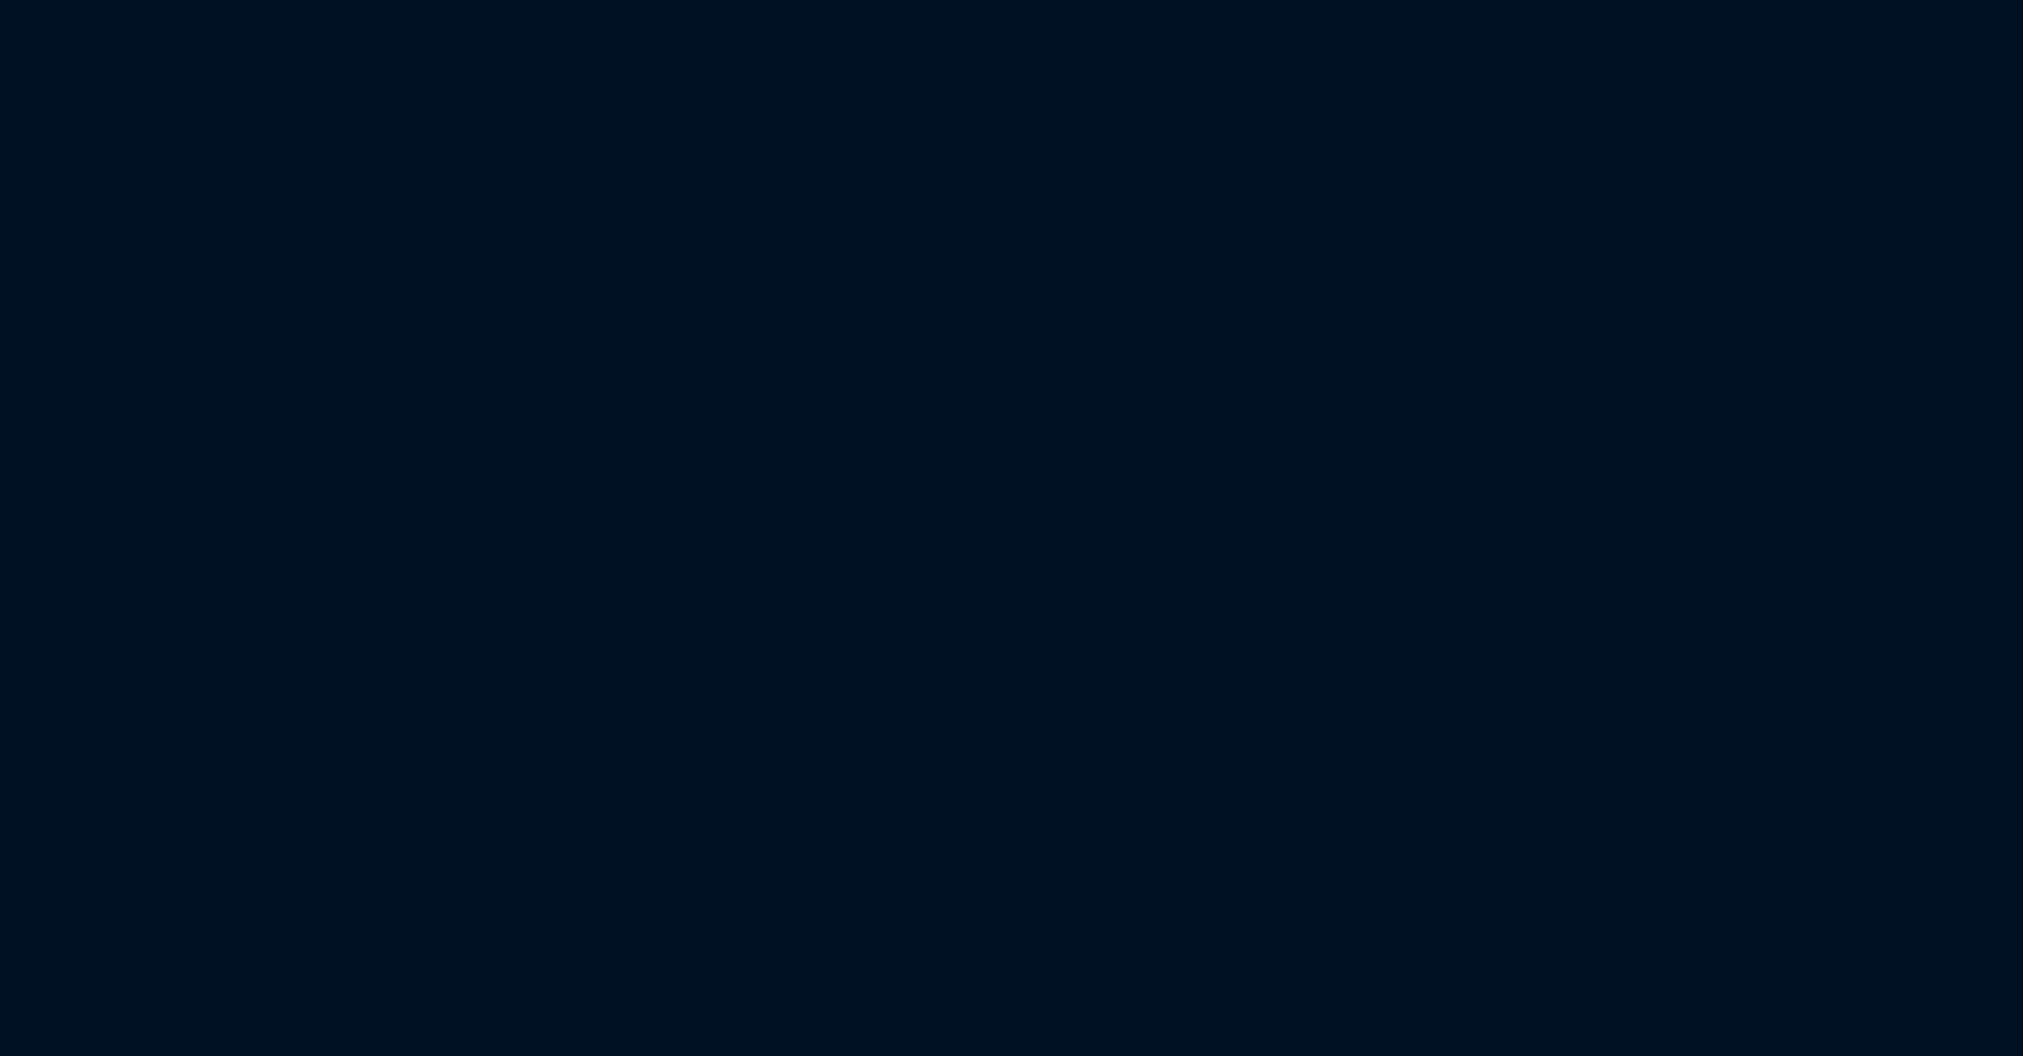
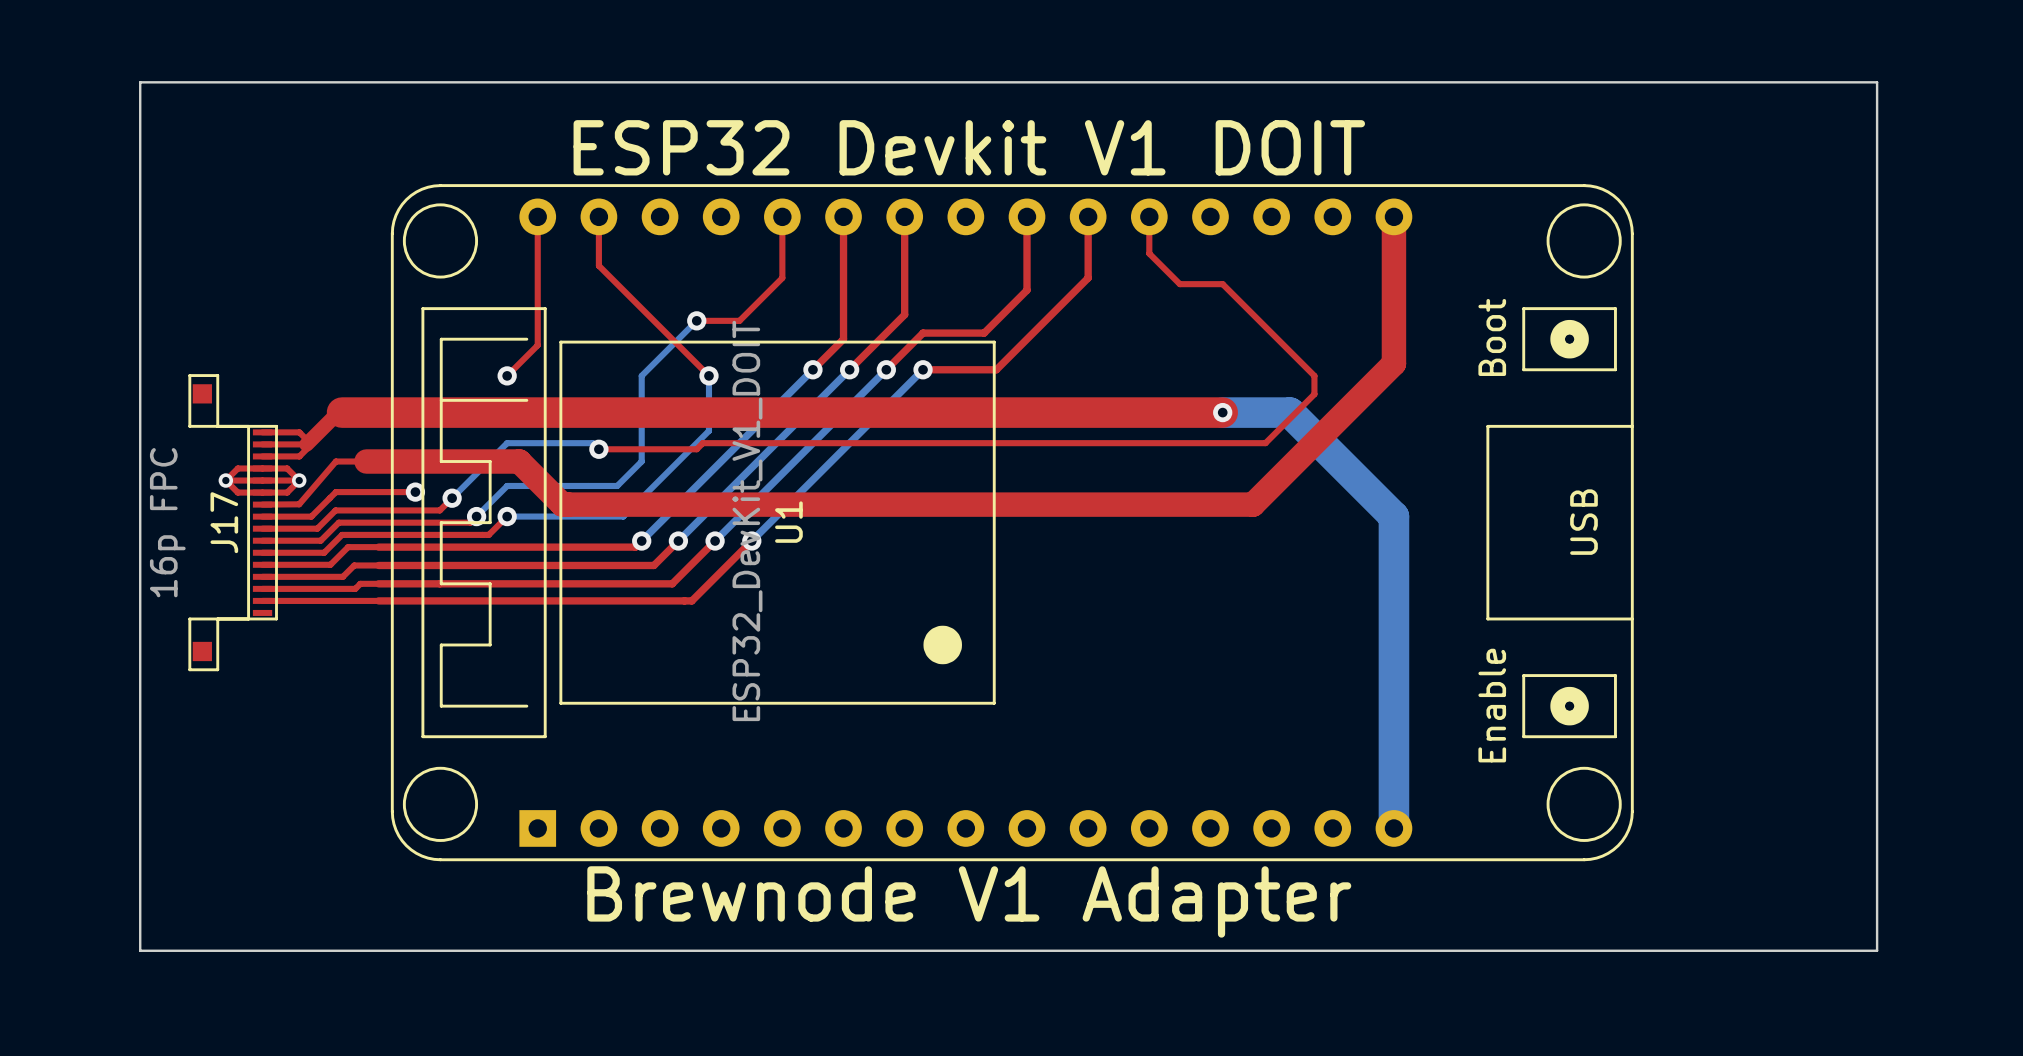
board edge: none -> (140, 82) (140, 950) (1877, 950) (1877, 82) (140, 82)
text: none -> ESP32 Devkit V1 DOIT (969, 147)
top track: none -> (537, 216) (537, 345) (507, 375)
top track: none -> (598, 216) (598, 265) (708, 375)
top track: none -> (782, 216) (782, 278) (739, 320) (696, 320)
top track: none -> (843, 216) (843, 339) (812, 369)
top track: none -> (904, 216) (904, 314) (849, 369)
top track: none -> (1027, 216) (1027, 290) (984, 333) (923, 333) (886, 369)
top track: none -> (1088, 216) (1088, 278) (996, 369) (923, 369)
top track: none -> (1149, 216) (1149, 253) (1179, 284) (1222, 284) (1314, 375) (1314, 394) (1265, 443) (702, 443) (696, 449) (598, 449)
top track: none -> (1393, 216) (1393, 363) (1253, 504) (562, 504) (519, 461) (335, 461) (299, 504) (262, 504)
bottom track: none -> (696, 320) (641, 375) (641, 461) (617, 485) (507, 485) (476, 516)
via: none -> (696, 320)
bottom track: none -> (812, 369) (641, 541)
via: none -> (812, 369)
bottom track: none -> (849, 369) (678, 541)
via: none -> (849, 369)
bottom track: none -> (886, 369) (715, 541)
via: none -> (886, 369)
bottom track: none -> (923, 369) (751, 541)
via: none -> (923, 369)
via: none -> (507, 375)
bottom track: none -> (708, 375) (708, 430) (623, 516) (507, 516)
via: none -> (708, 375)
top track: none -> (1222, 412) (338, 412) (306, 444)
bottom track: none -> (1222, 412) (1289, 412) (1393, 516) (1393, 828)
via: none -> (1222, 412)
top track: none -> (262, 432) (299, 432) (311, 444)
top track: none -> (262, 444) (311, 444)
top track: none -> (311, 444) (299, 456) (262, 456)
bottom track: none -> (598, 449) (592, 443) (507, 443) (452, 498)
via: none -> (598, 449)
top track: none -> (225, 480) (237, 468) (287, 468) (299, 480)
top track: none -> (225, 480) (299, 480)
top track: none -> (225, 480) (237, 492) (287, 492) (299, 480)
via: none -> (225, 480)
via: none -> (299, 480)
top track: none -> (415, 492) (335, 492) (311, 516) (262, 516)
via: none -> (415, 492)
top track: none -> (452, 498) (439, 510) (335, 510) (317, 528) (262, 528)
via: none -> (452, 498)
top track: none -> (476, 516) (470, 522) (338, 522) (320, 540) (262, 540)
via: none -> (476, 516)
top track: none -> (507, 516) (488, 534) (342, 534) (324, 552) (262, 552)
via: none -> (507, 516)
J17: none -> 16p FPC (233, 522)
U1: none -> ESP32_DevKit_V1_DOIT (1012, 522)
top track: none -> (641, 541) (635, 547) (348, 547) (330, 564) (262, 564)
via: none -> (641, 541)
top track: none -> (678, 541) (653, 565) (354, 565) (342, 576) (262, 576)
via: none -> (678, 541)
top track: none -> (715, 541) (672, 583) (360, 583) (355, 588) (262, 588)
via: none -> (715, 541)
top track: none -> (751, 541) (691, 600) (262, 600)
via: none -> (751, 541)
text: none -> Brewnode V1 Adapter (969, 901)

